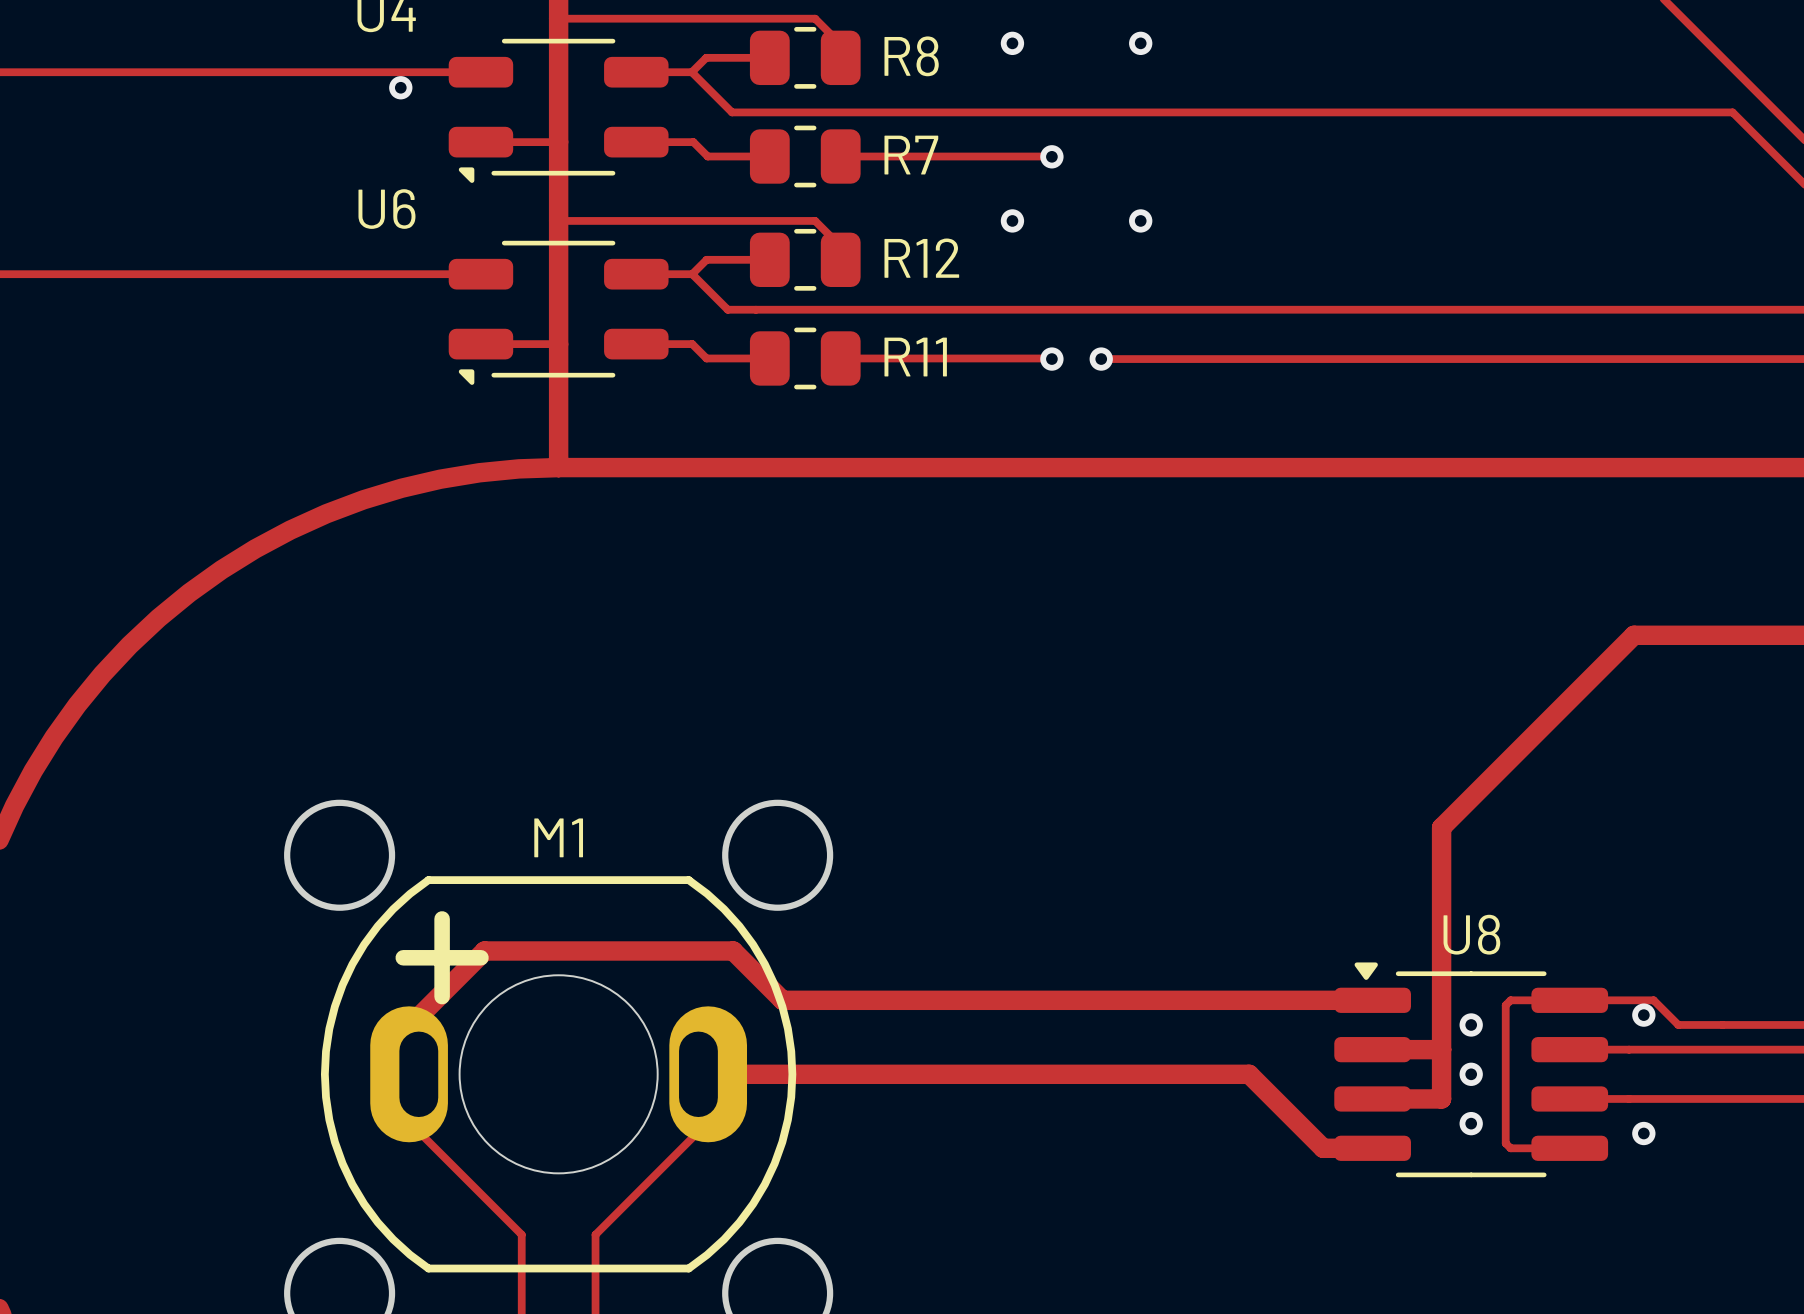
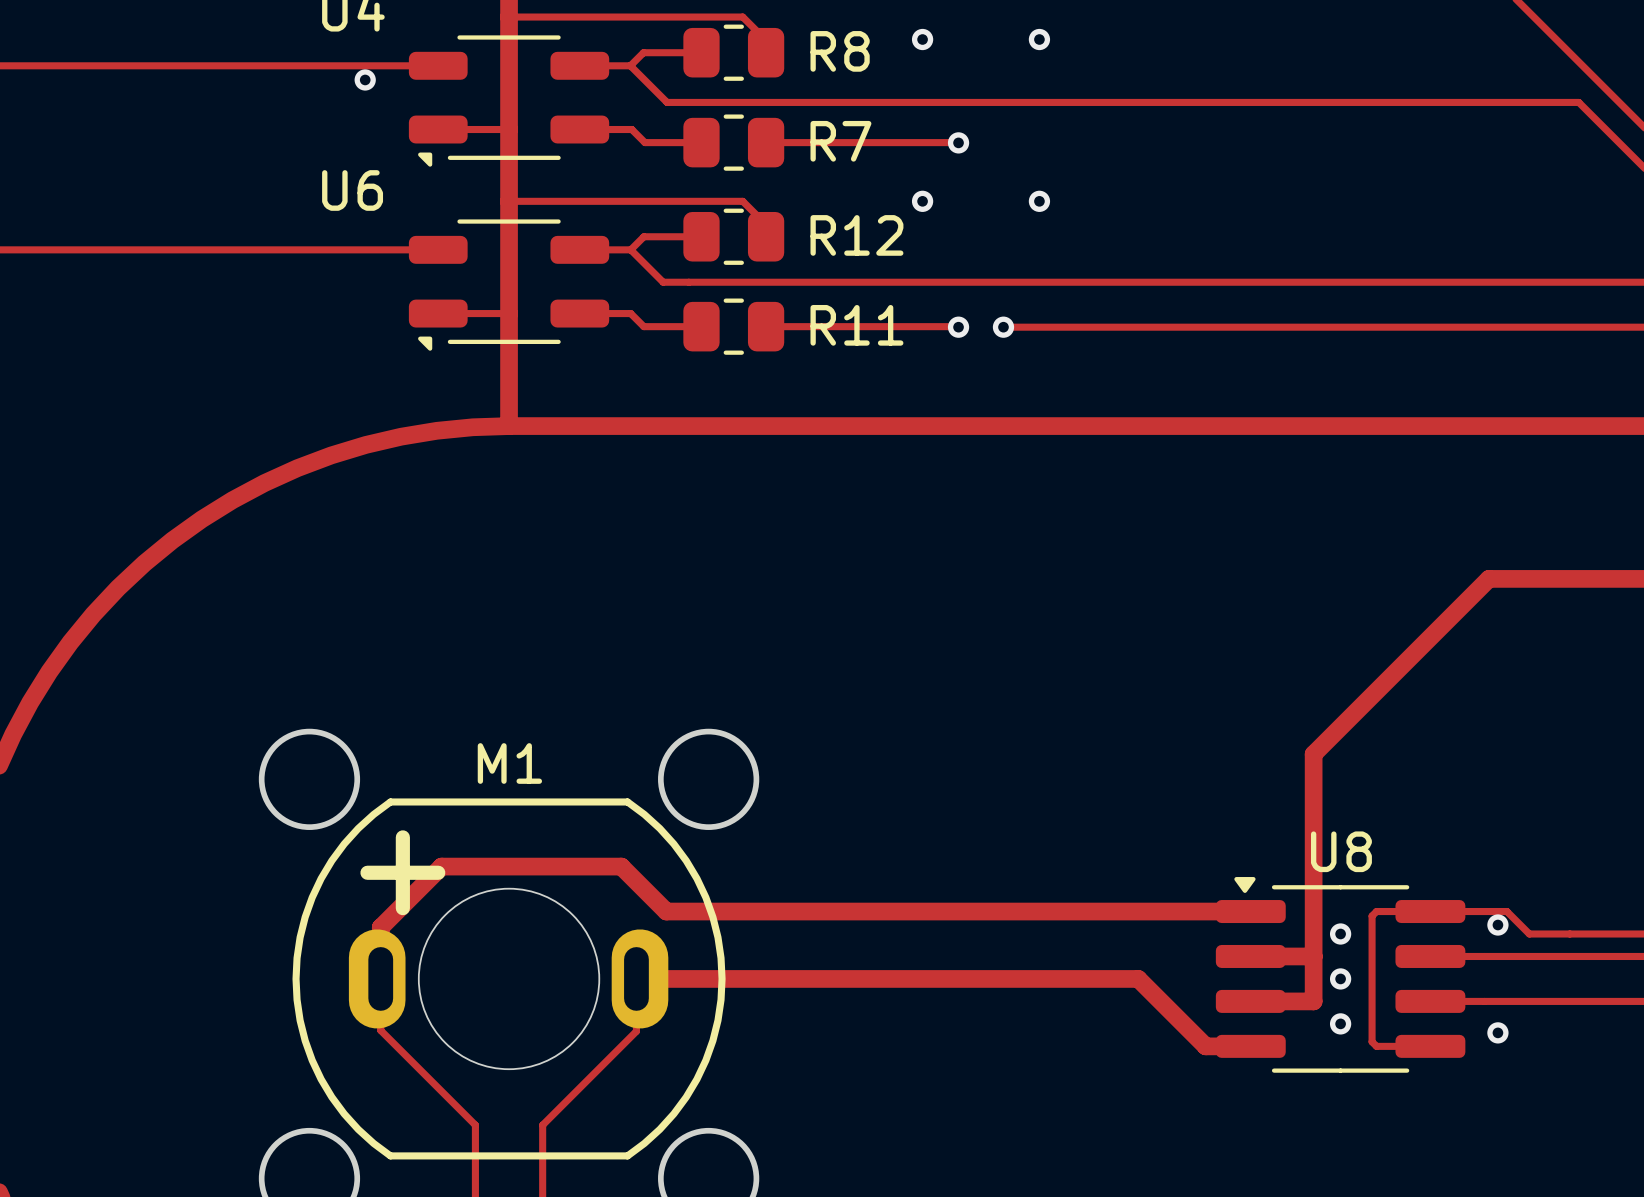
M1 footprint: [320, 876, 797, 1273] -> [292, 798, 726, 1160]
track: (681, 950) (733, 950) (782, 1000) -> (621, 866) (666, 911) (713, 911)

